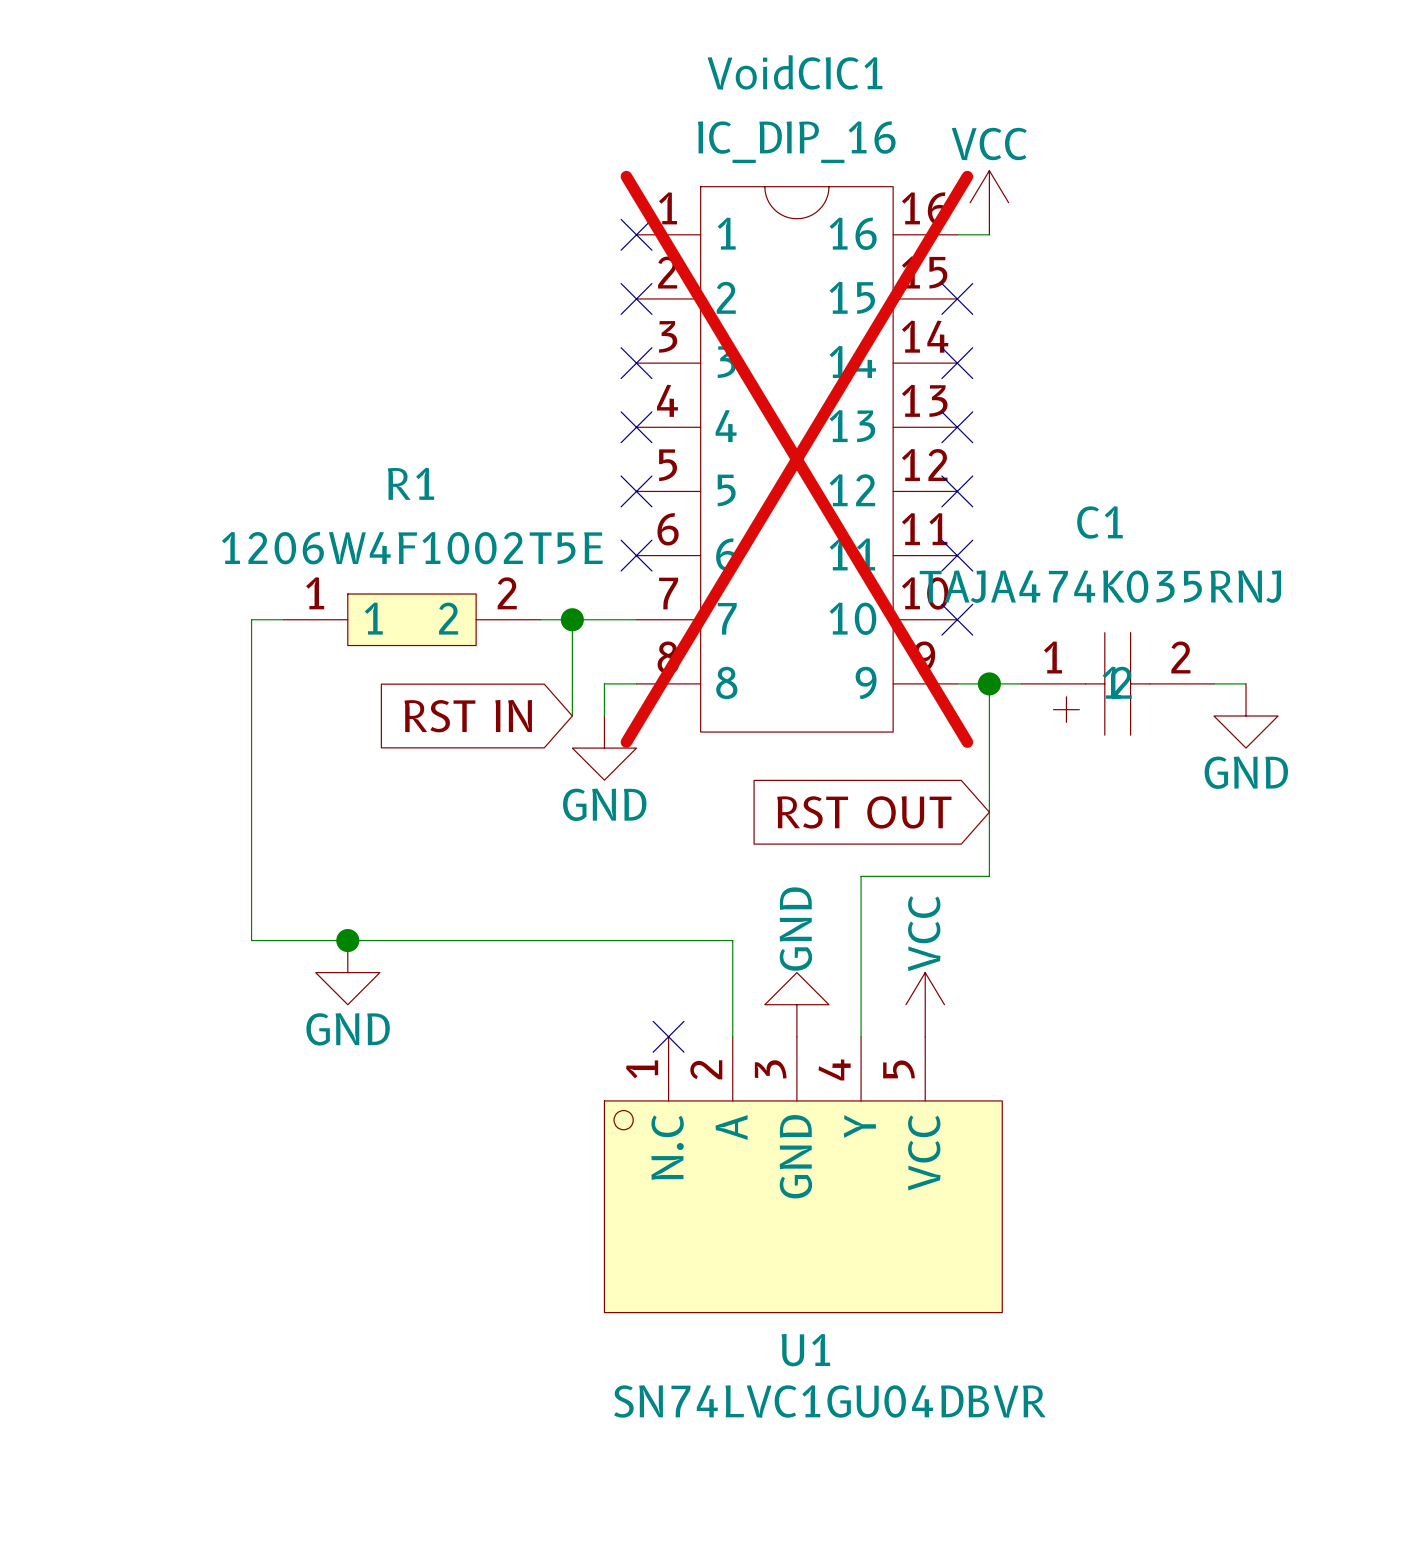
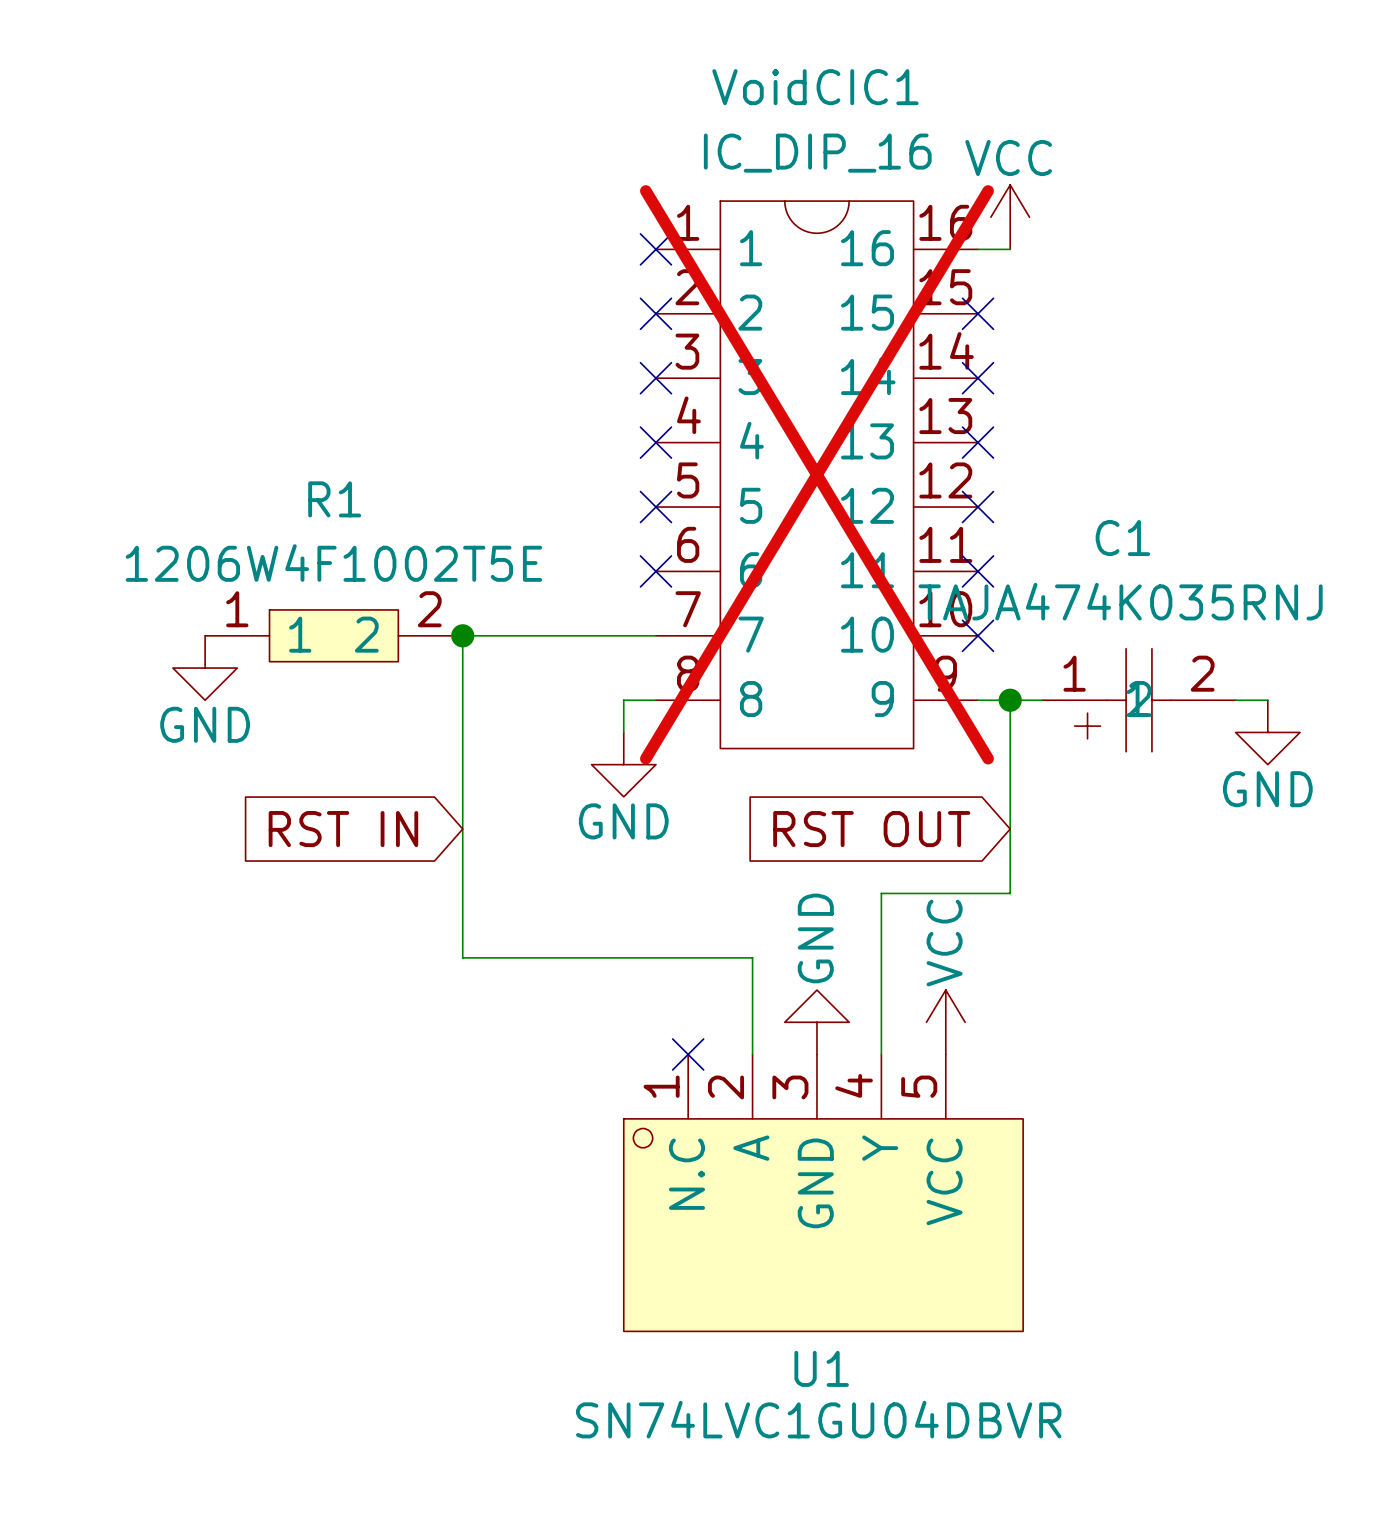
wire: (283, 619) (251, 619) (251, 940) (444, 940) -> (559, 635) (462, 635) (462, 957)
R1 position: (411, 619) -> (333, 635)
wire: (572, 619) (572, 715) -> none
junction position: (572, 619) -> (462, 635)
global label position: RST IN (468, 716) -> RST IN (343, 829)
junction: (347, 940) -> none
power symbol position: GND (347, 972) -> GND (205, 668)

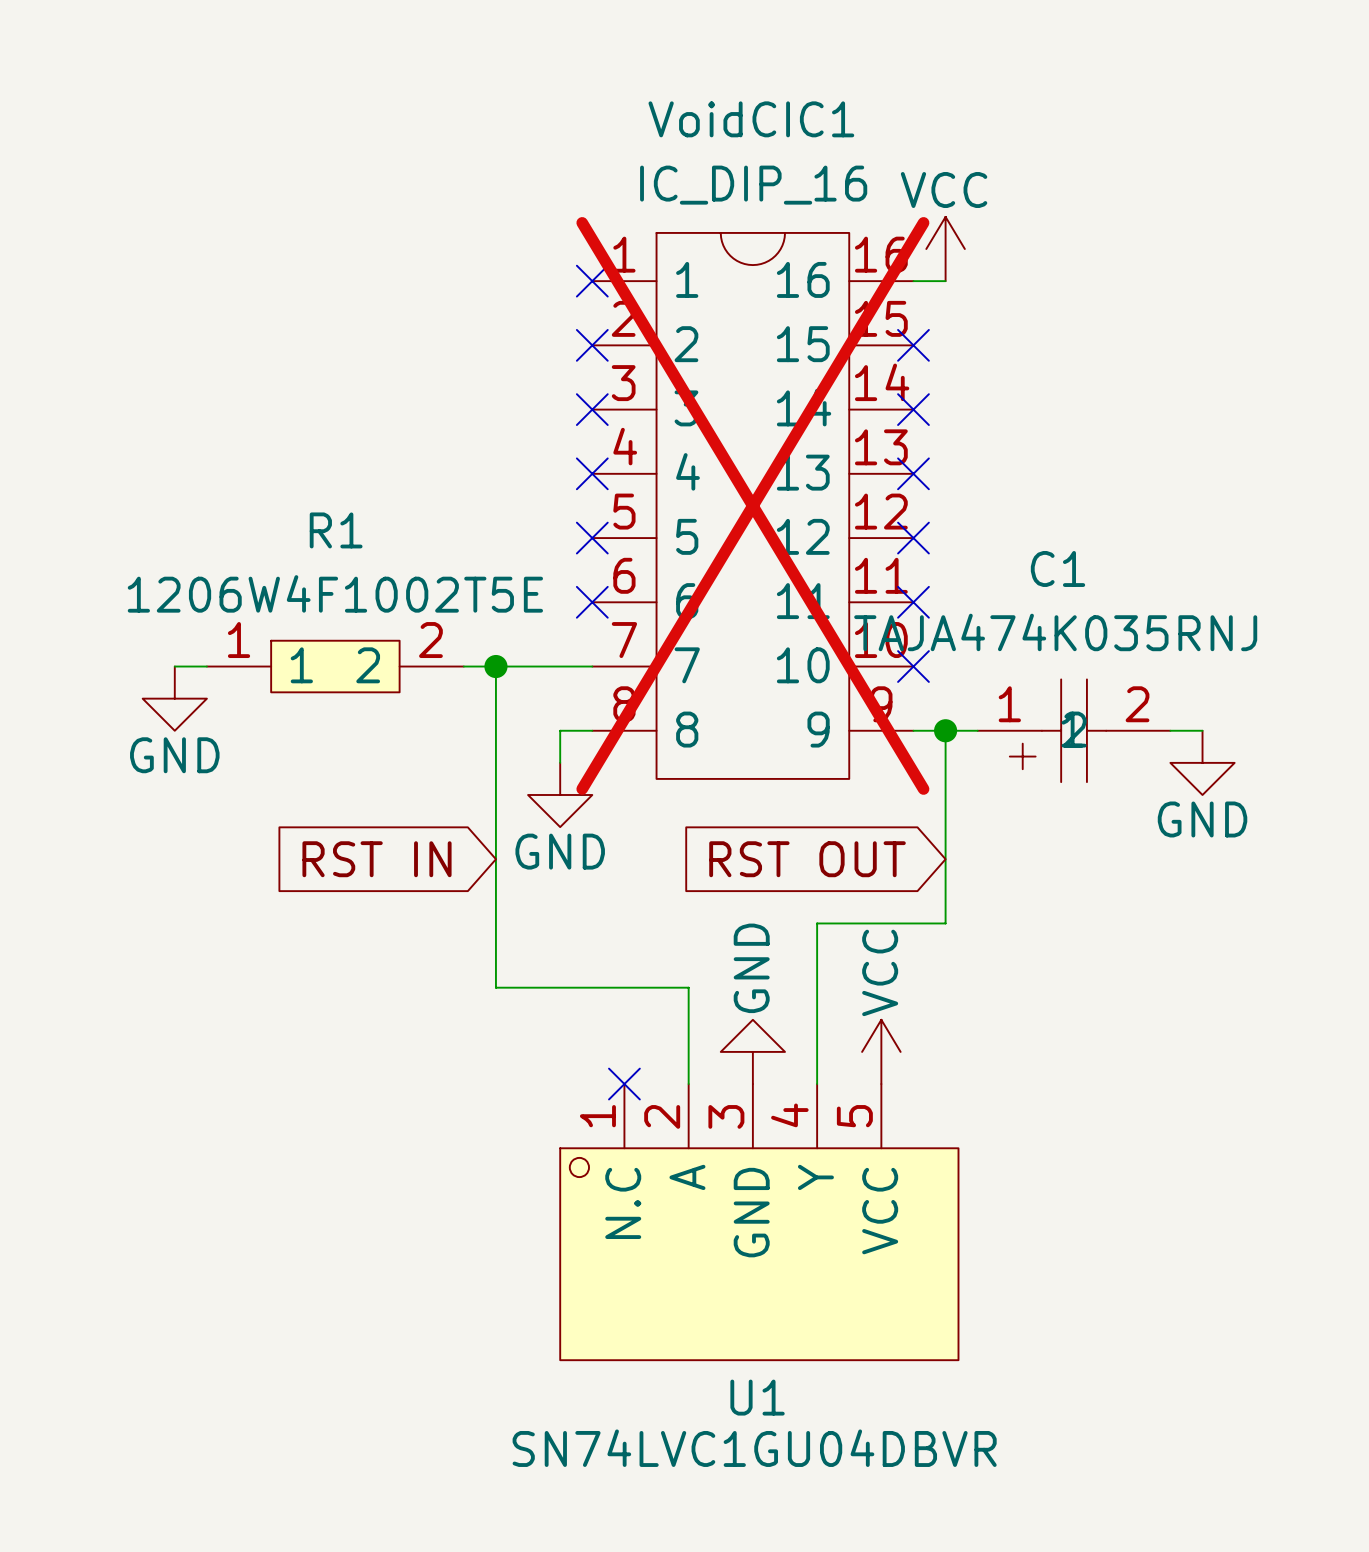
R1 position: (333, 635) -> (335, 666)
junction position: (462, 635) -> (495, 666)
wire: (527, 635) (462, 635) (462, 957) (559, 957) -> (495, 666) (495, 987)
power symbol position: GND (205, 668) -> GND (174, 698)
global label position: RST IN (343, 829) -> RST IN (377, 859)

